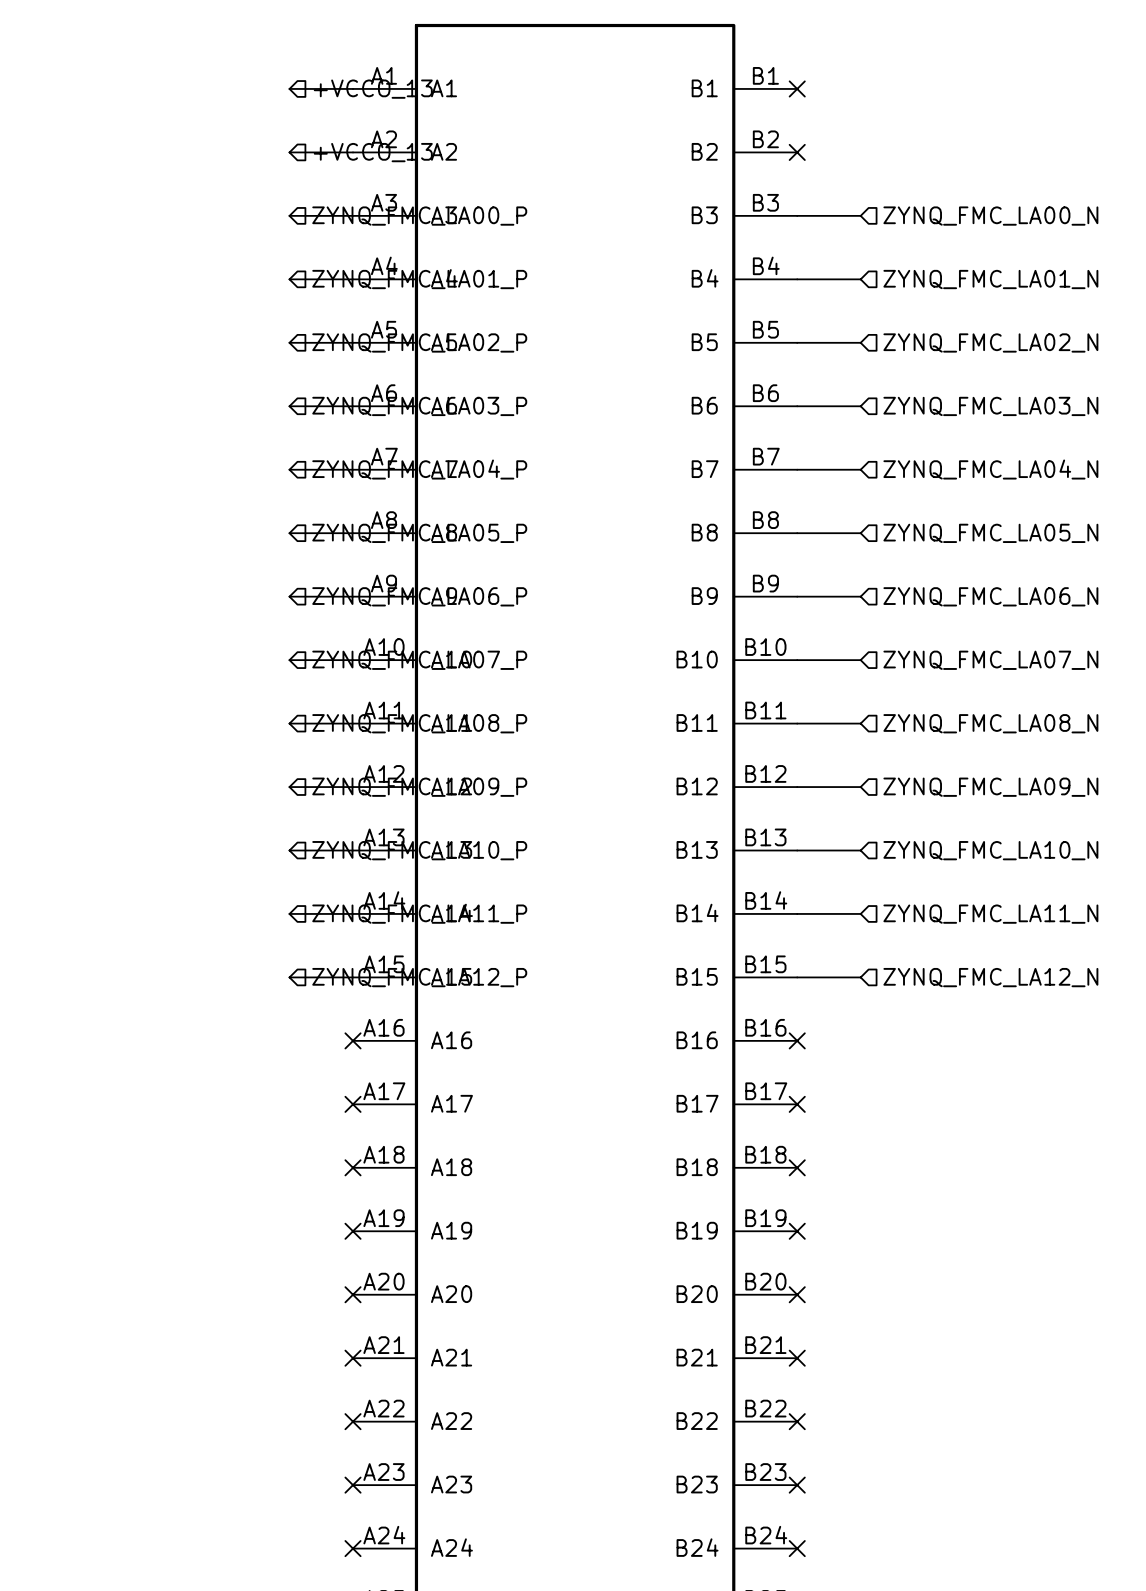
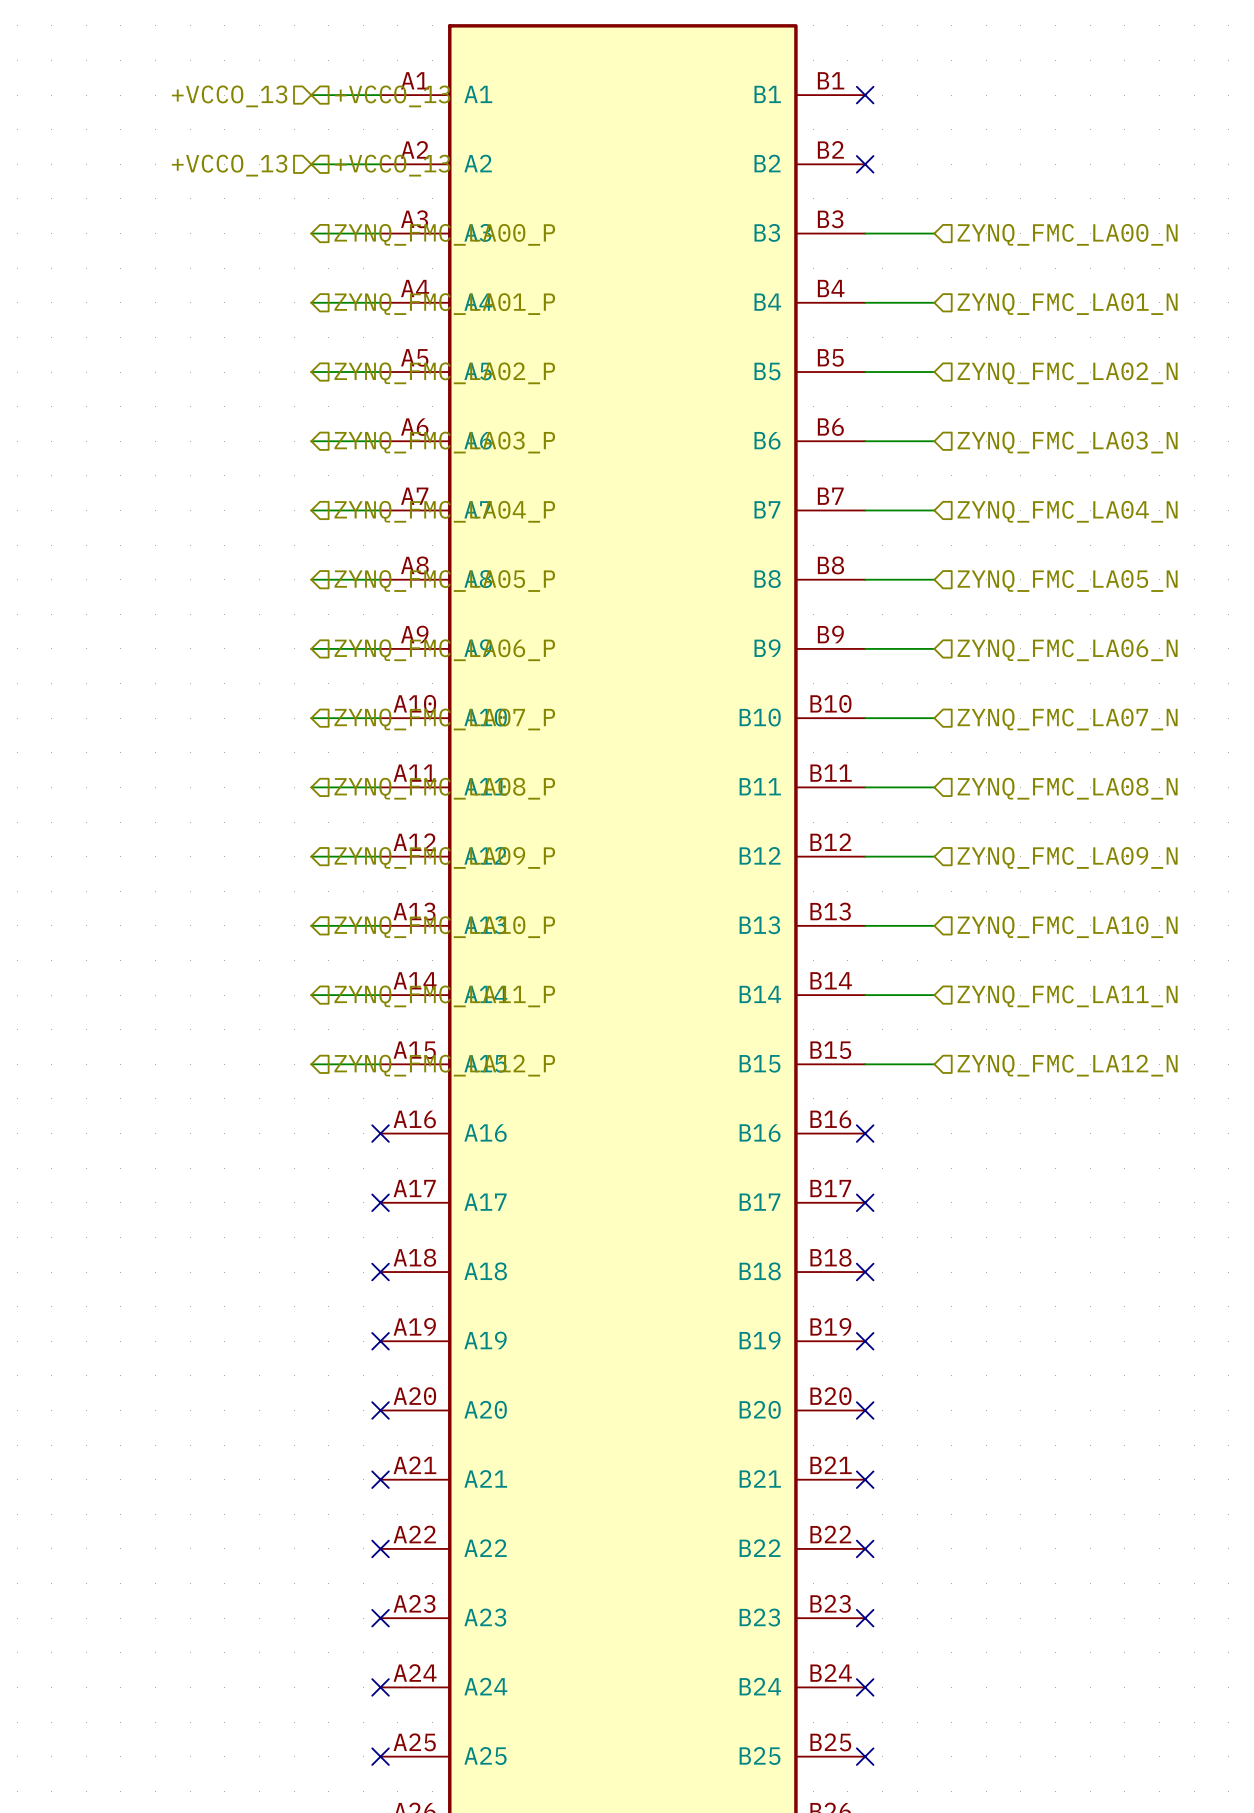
hierarchical label: none -> +VCCO_13 (229, 96)
hierarchical label: none -> +VCCO_13 (229, 165)

